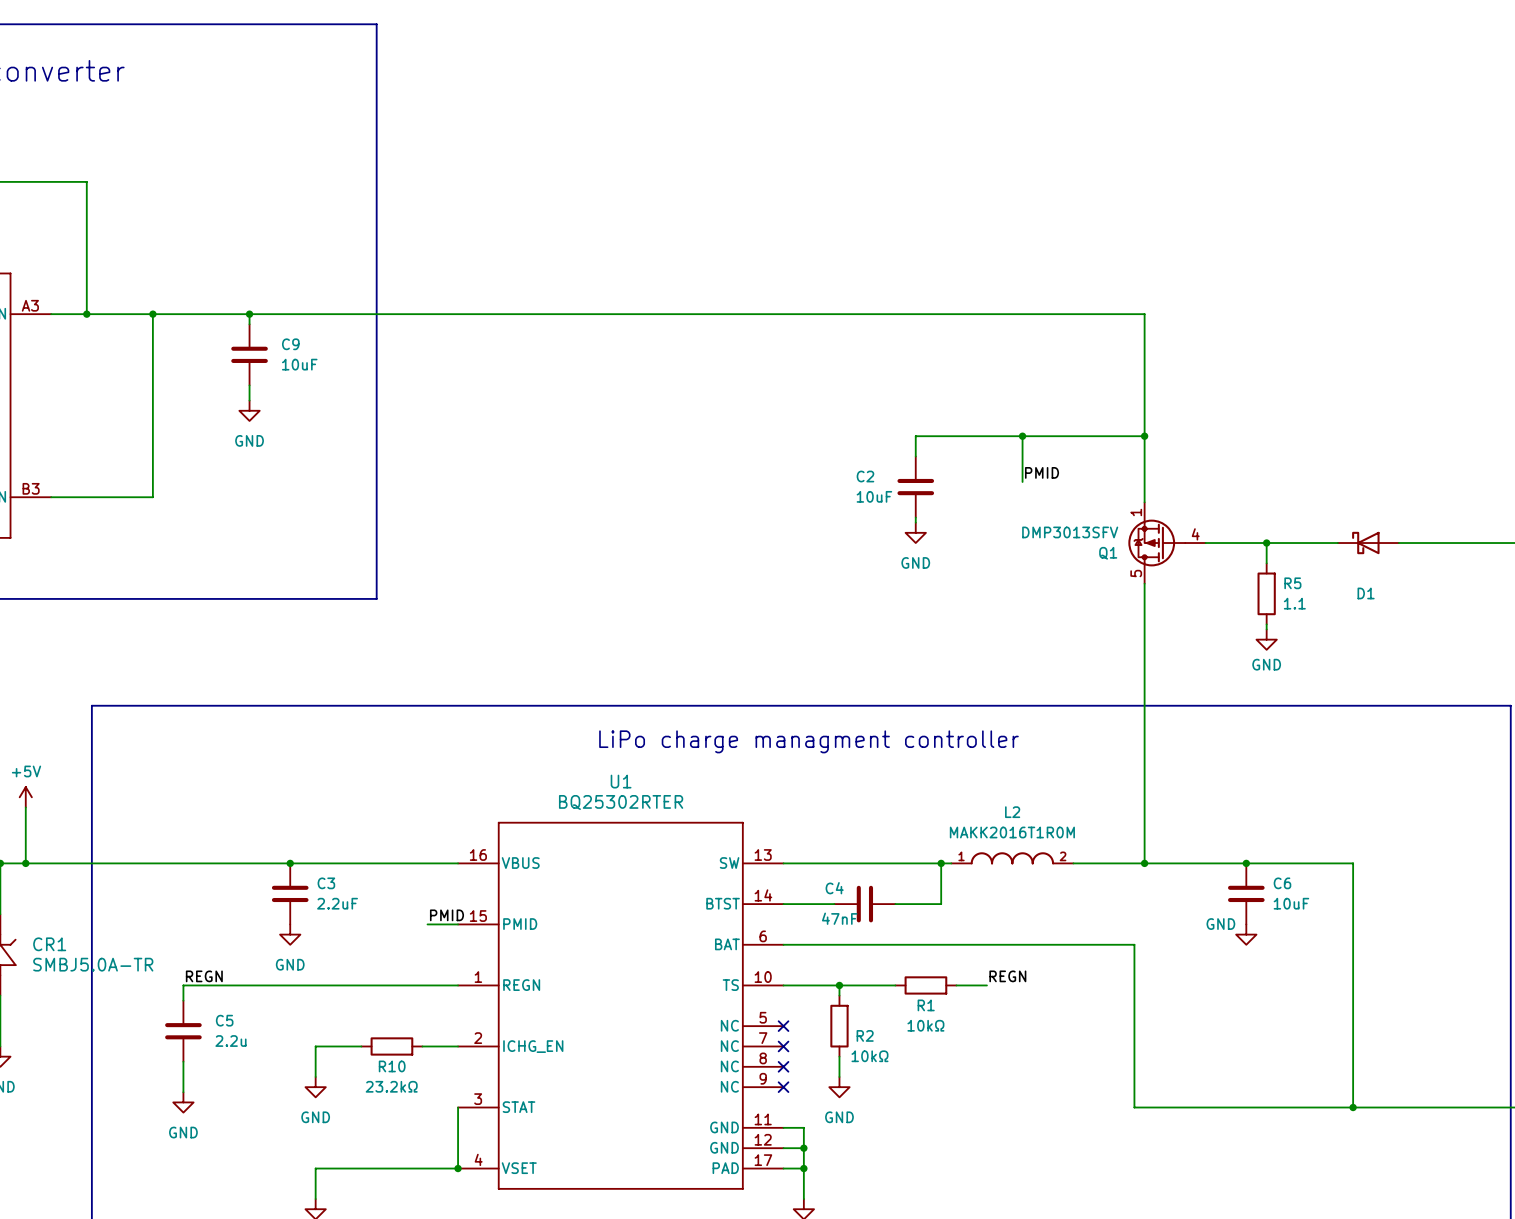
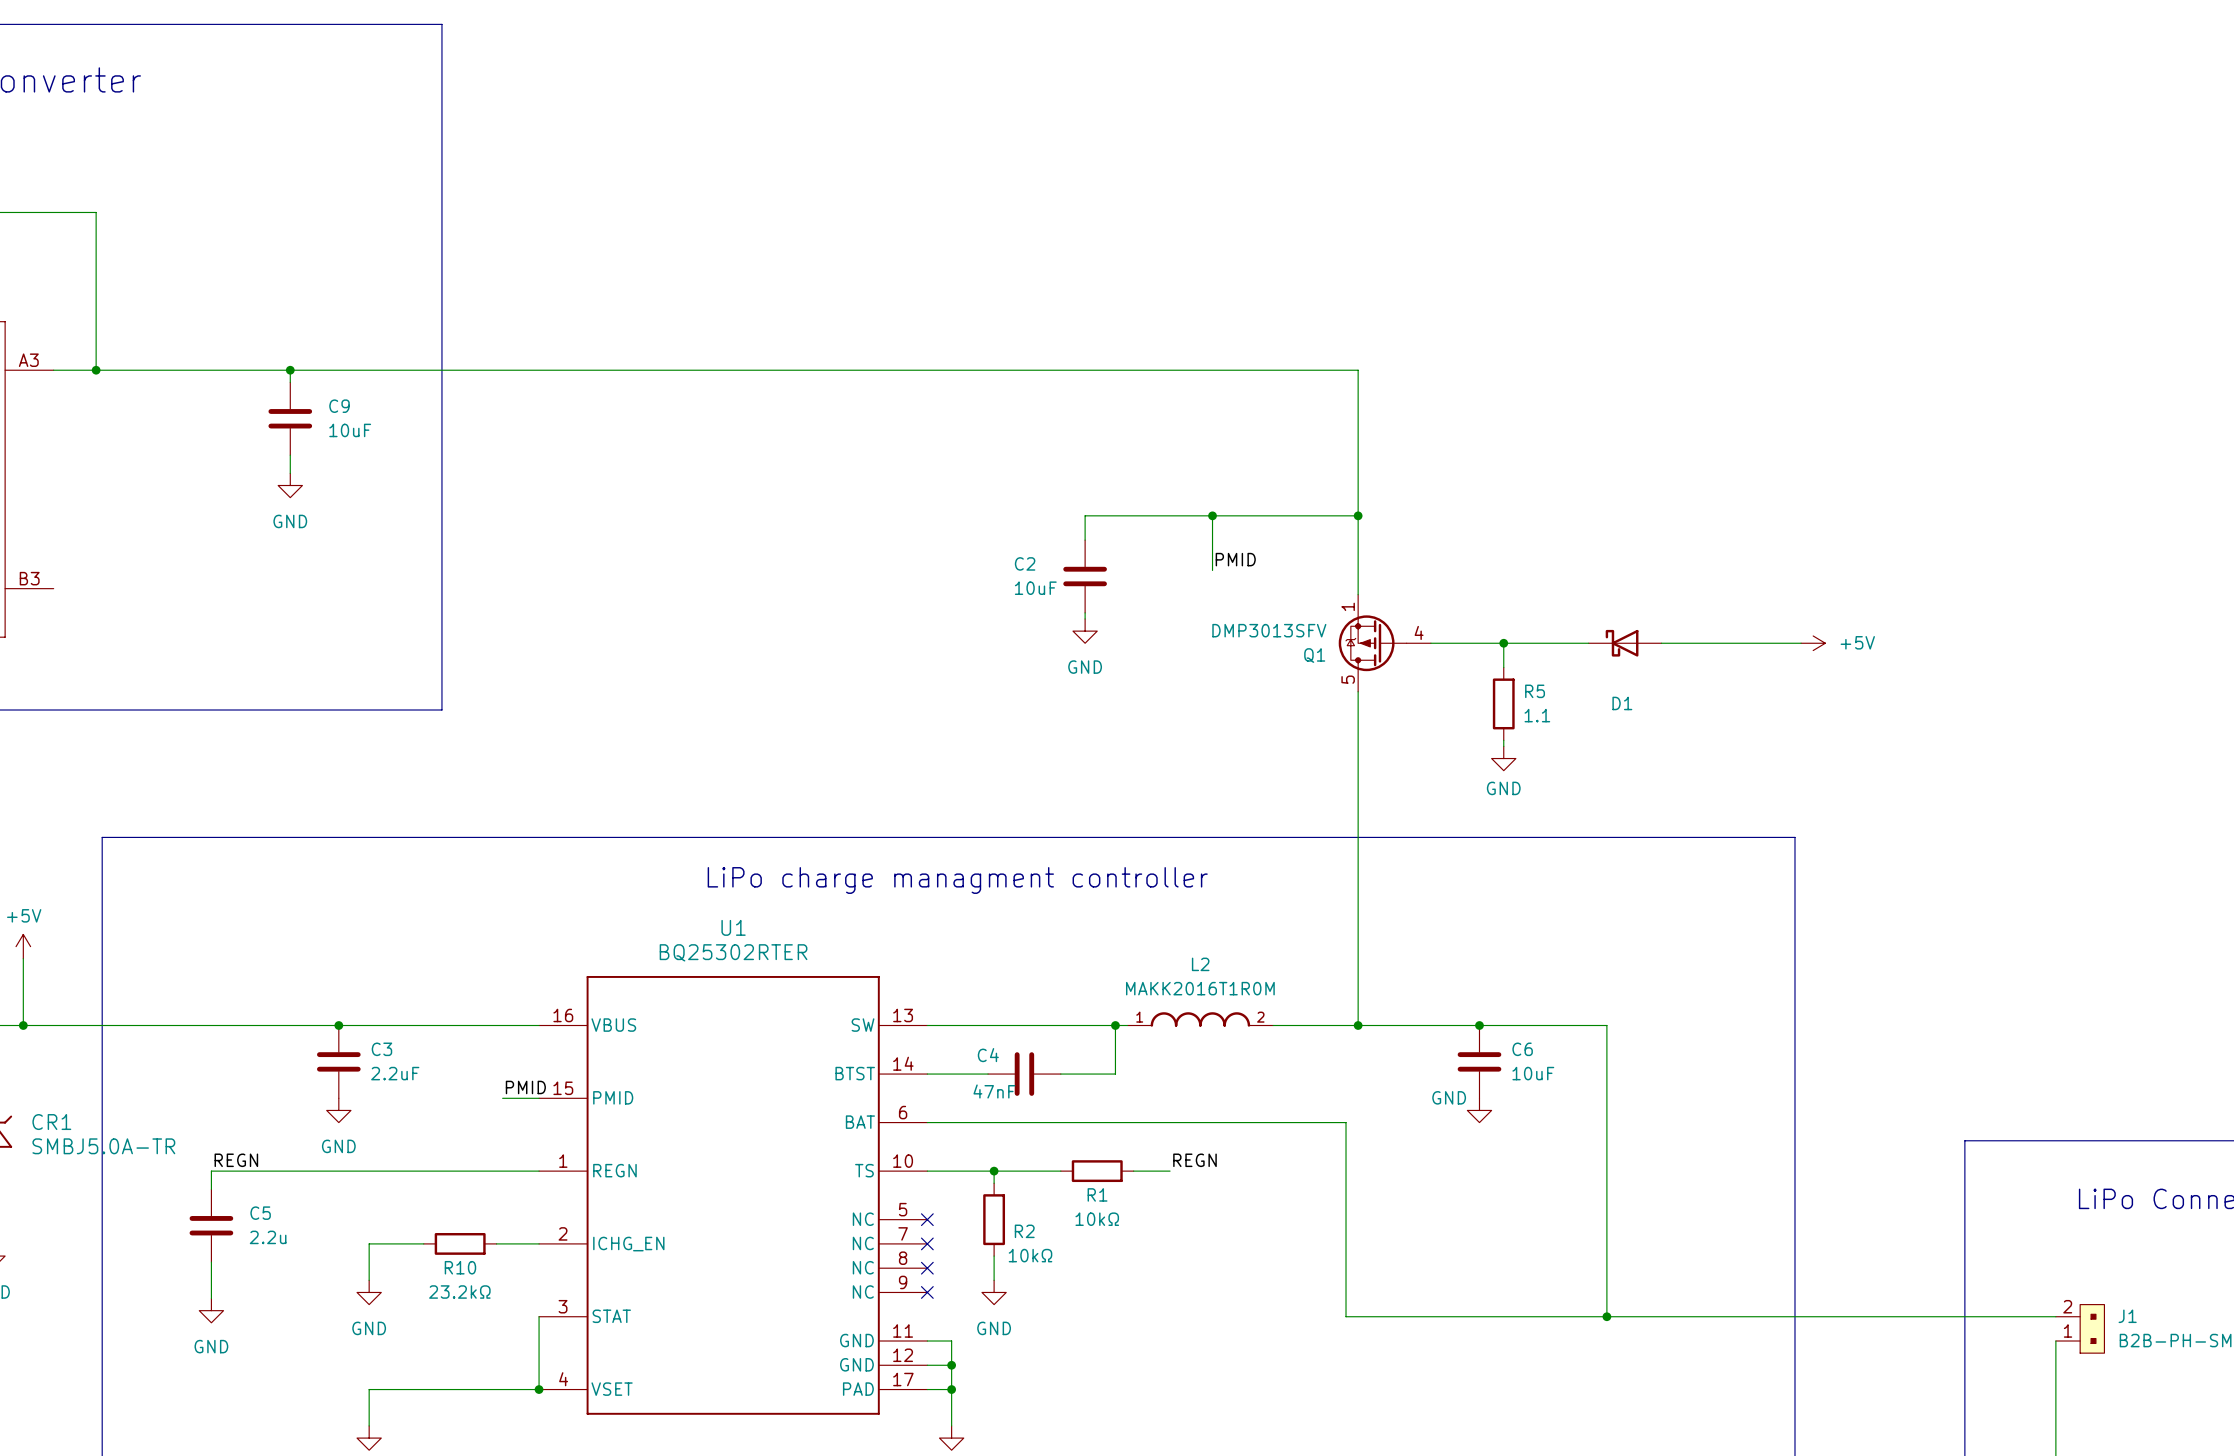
wire: (152, 314) (152, 497) (51, 497) -> none
junction: (152, 314) -> none

